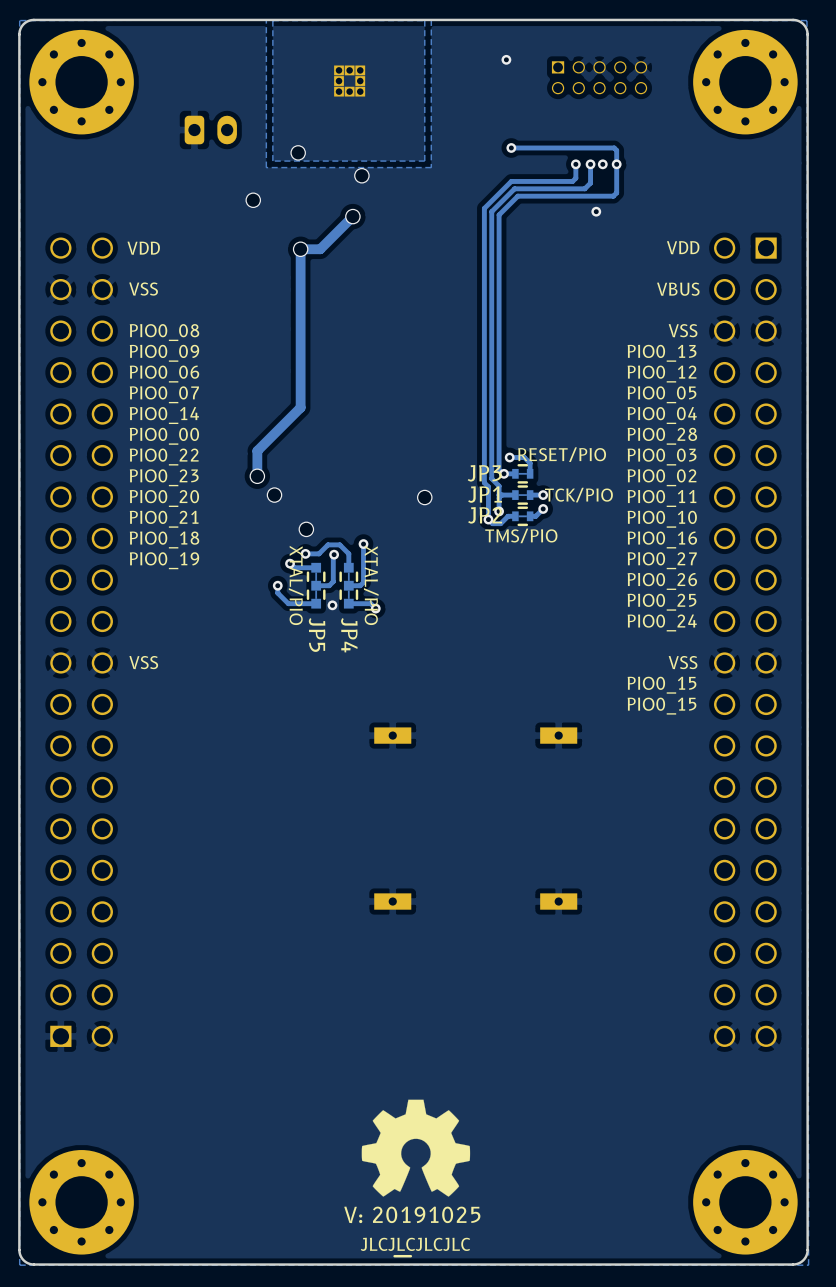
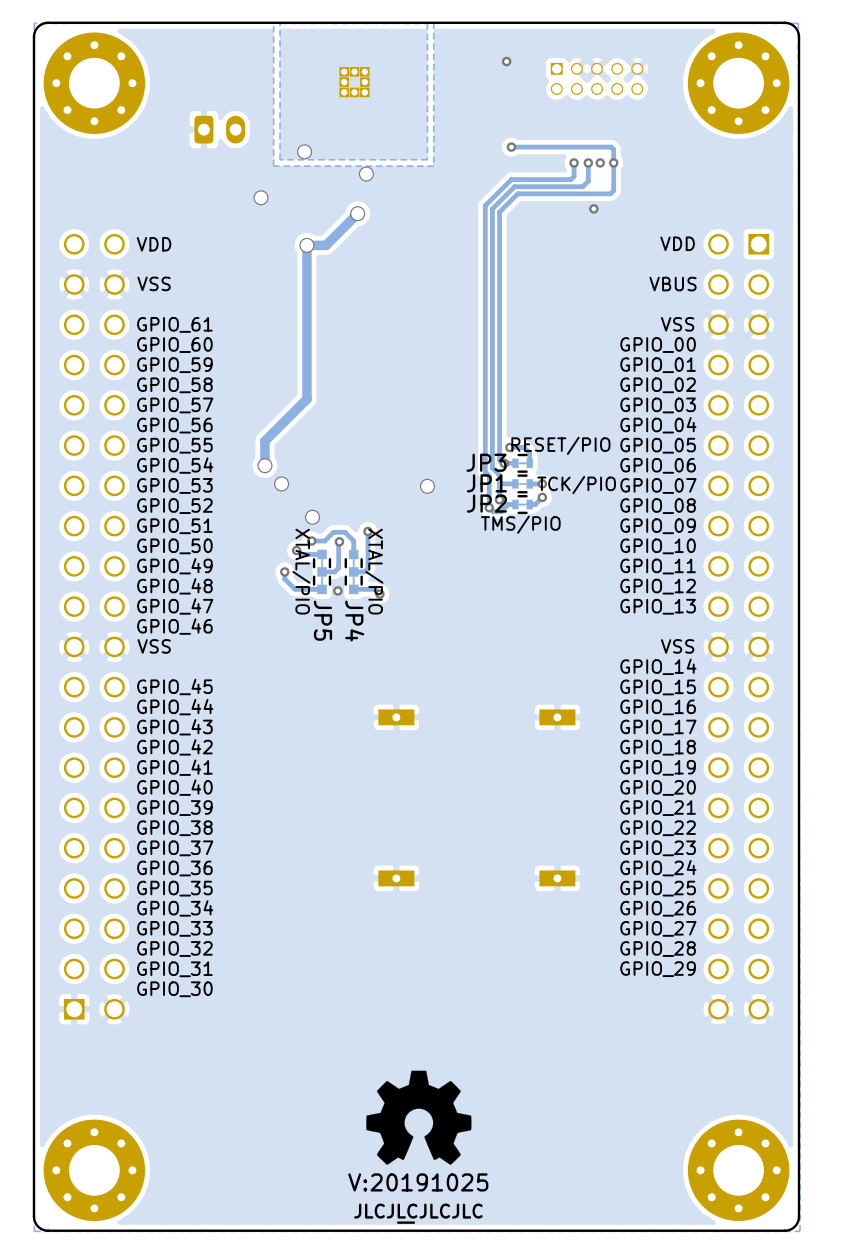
part footprint: [50, 237, 113, 1047] -> [63, 233, 125, 1020]
part footprint: [714, 237, 777, 1047] -> [708, 233, 770, 1020]

